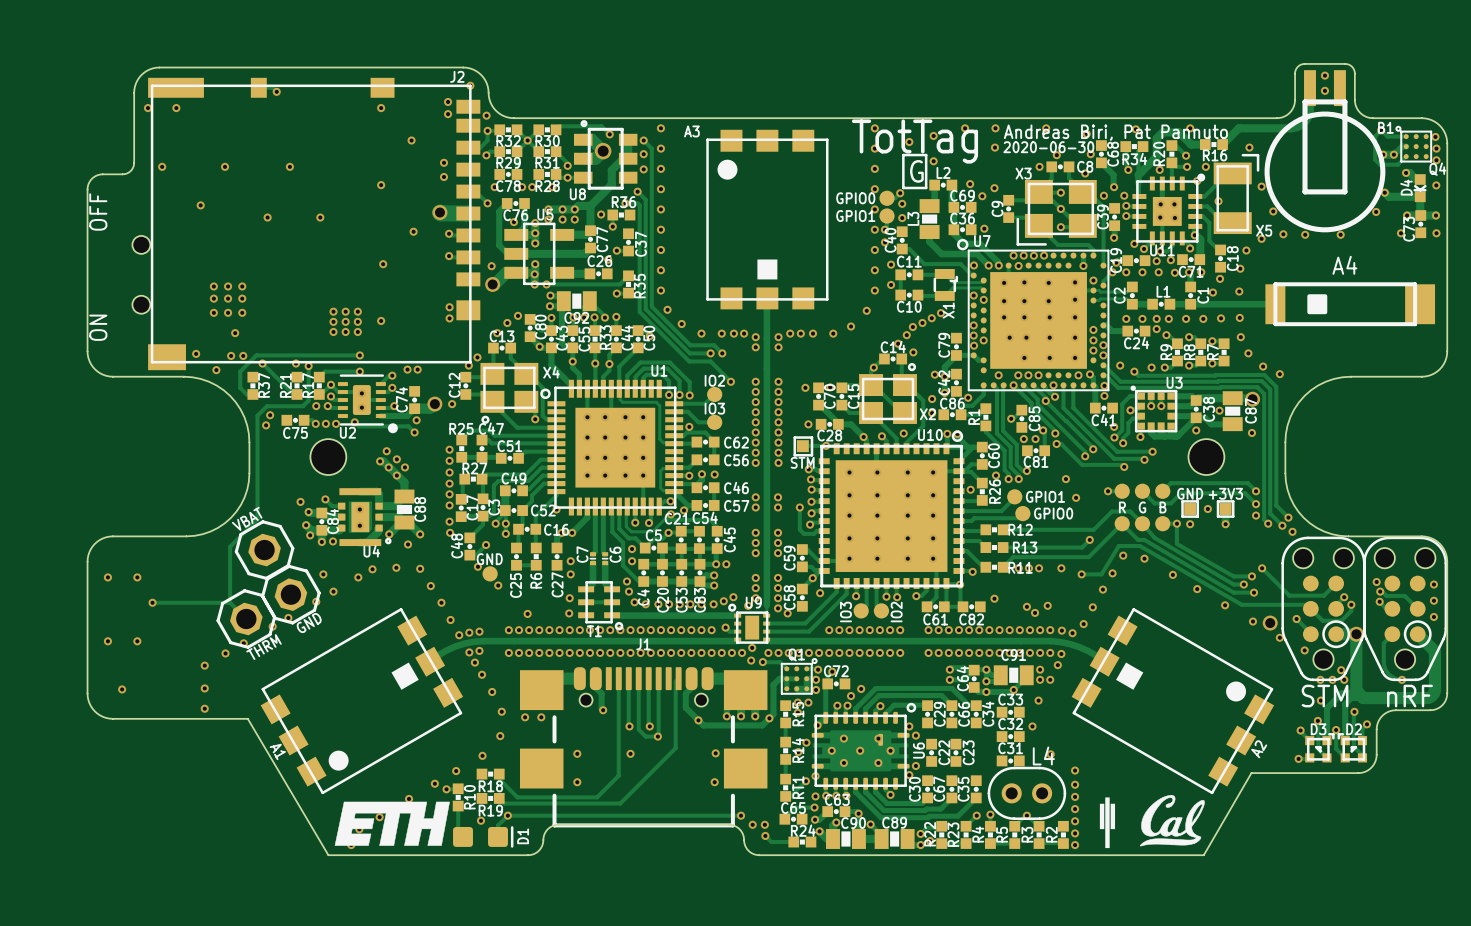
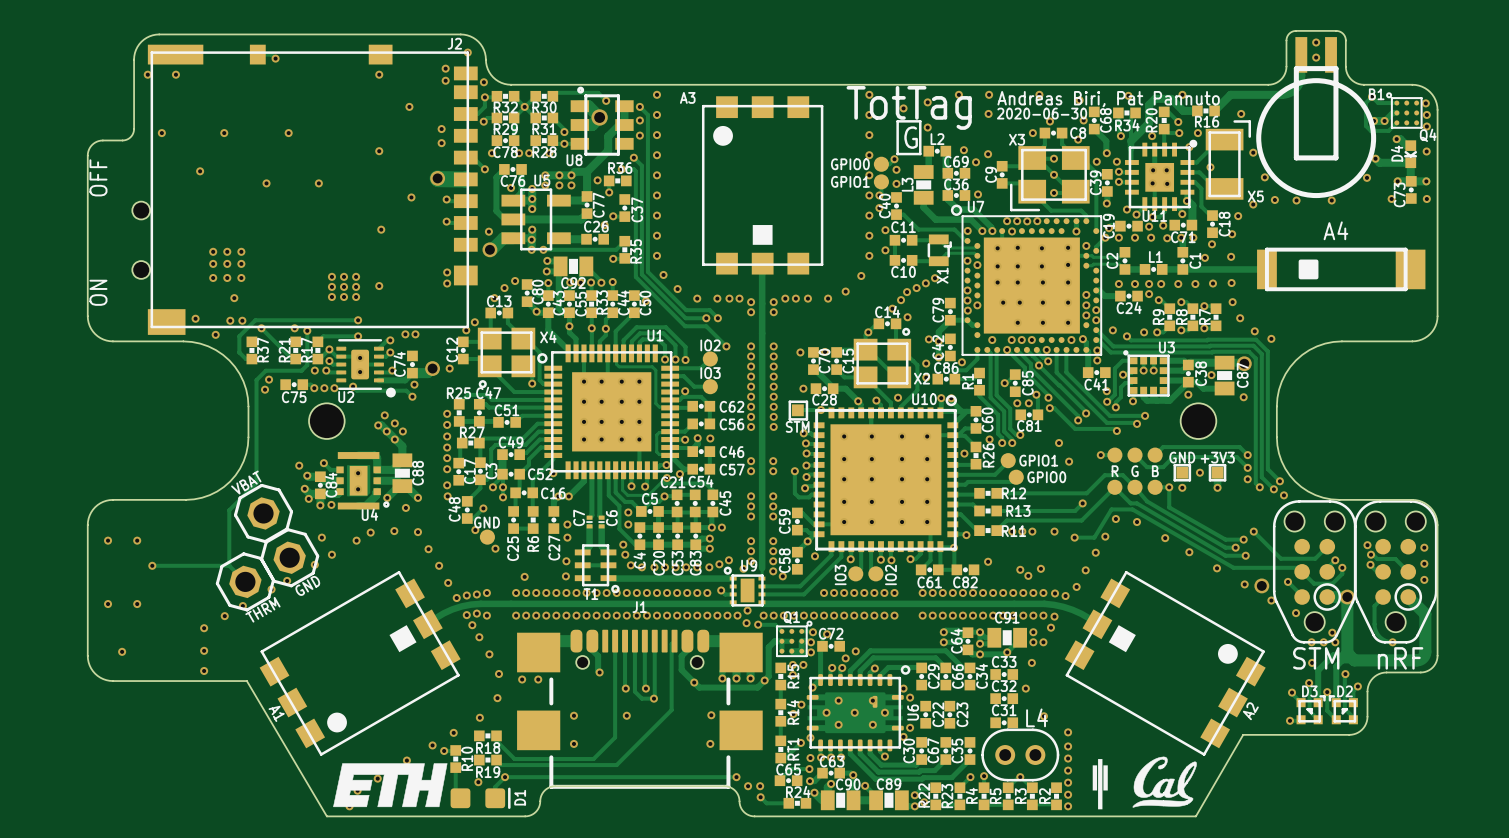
via: none -> (486, 592)
via: (508, 630) -> none
via: none -> (486, 615)
via: (508, 652) -> none

